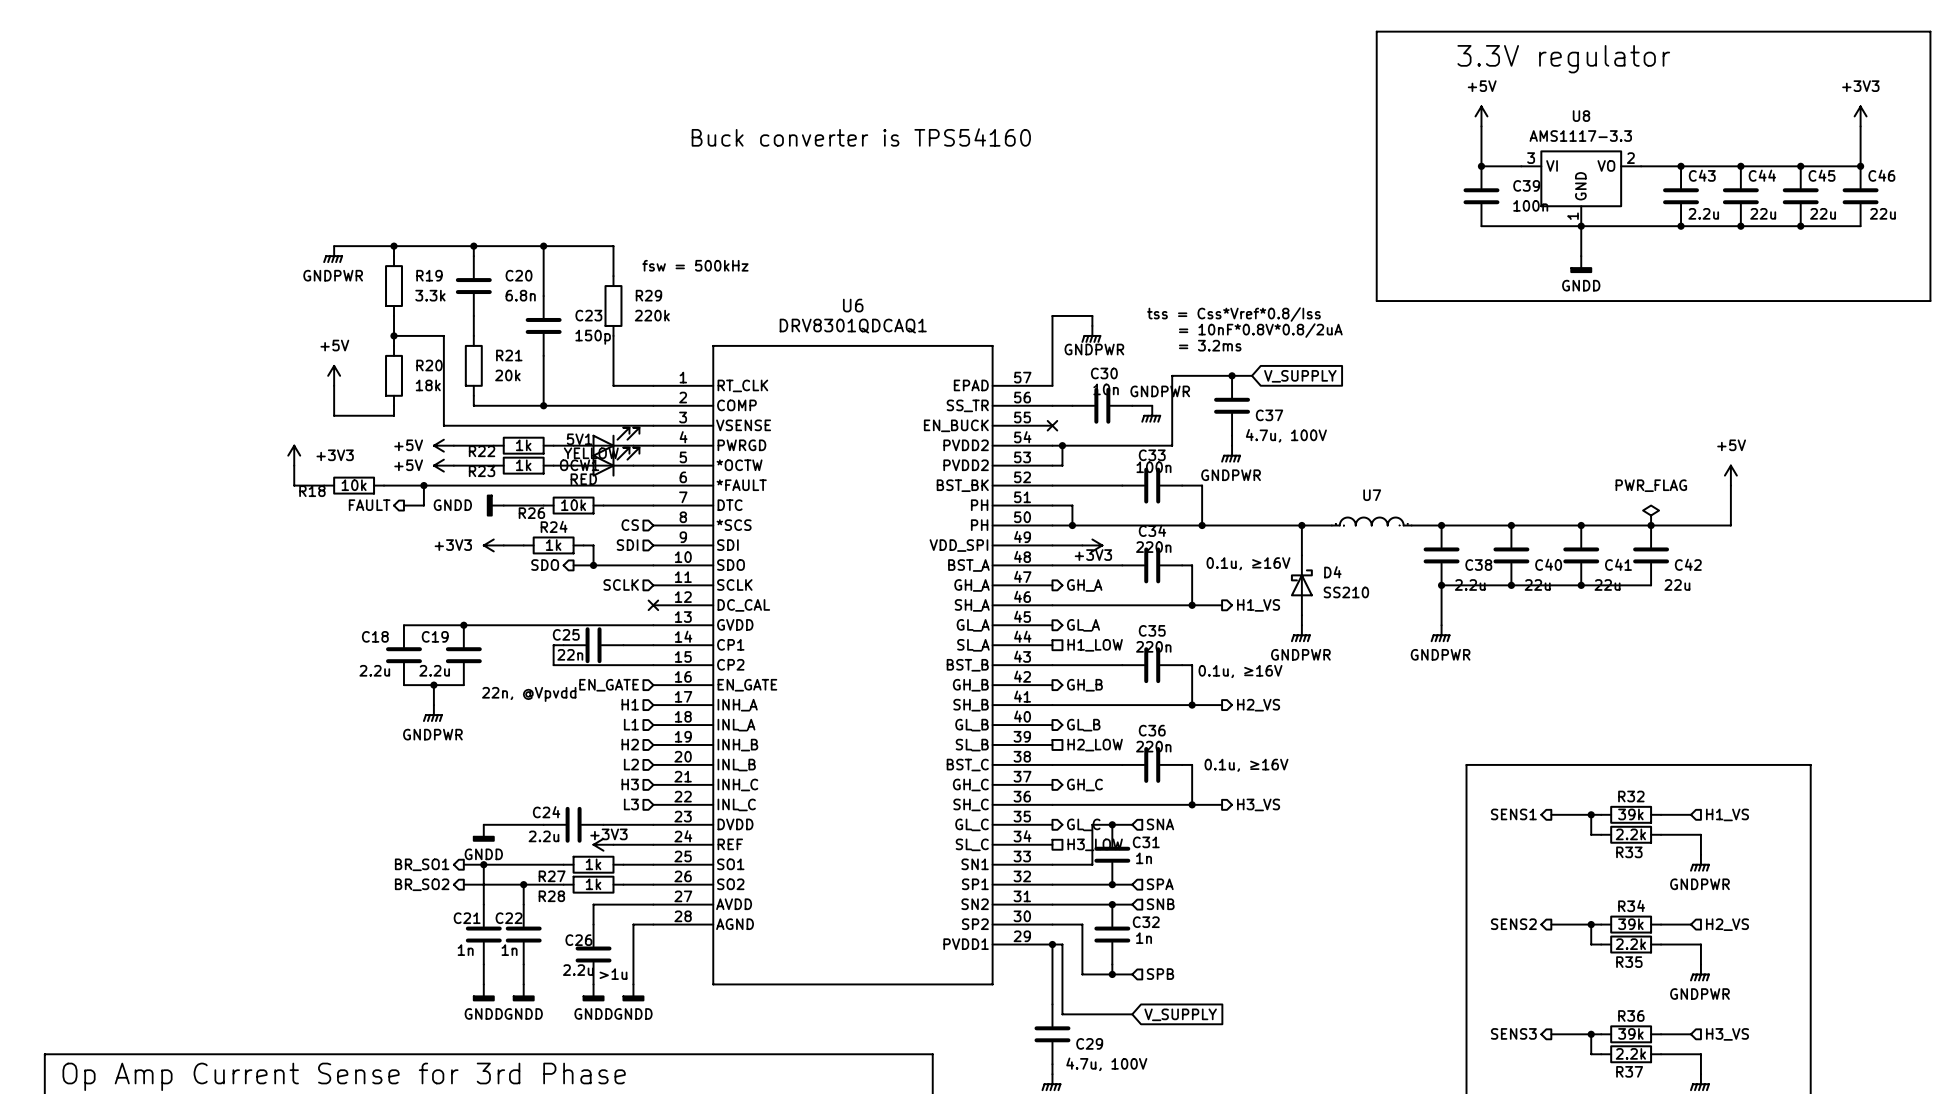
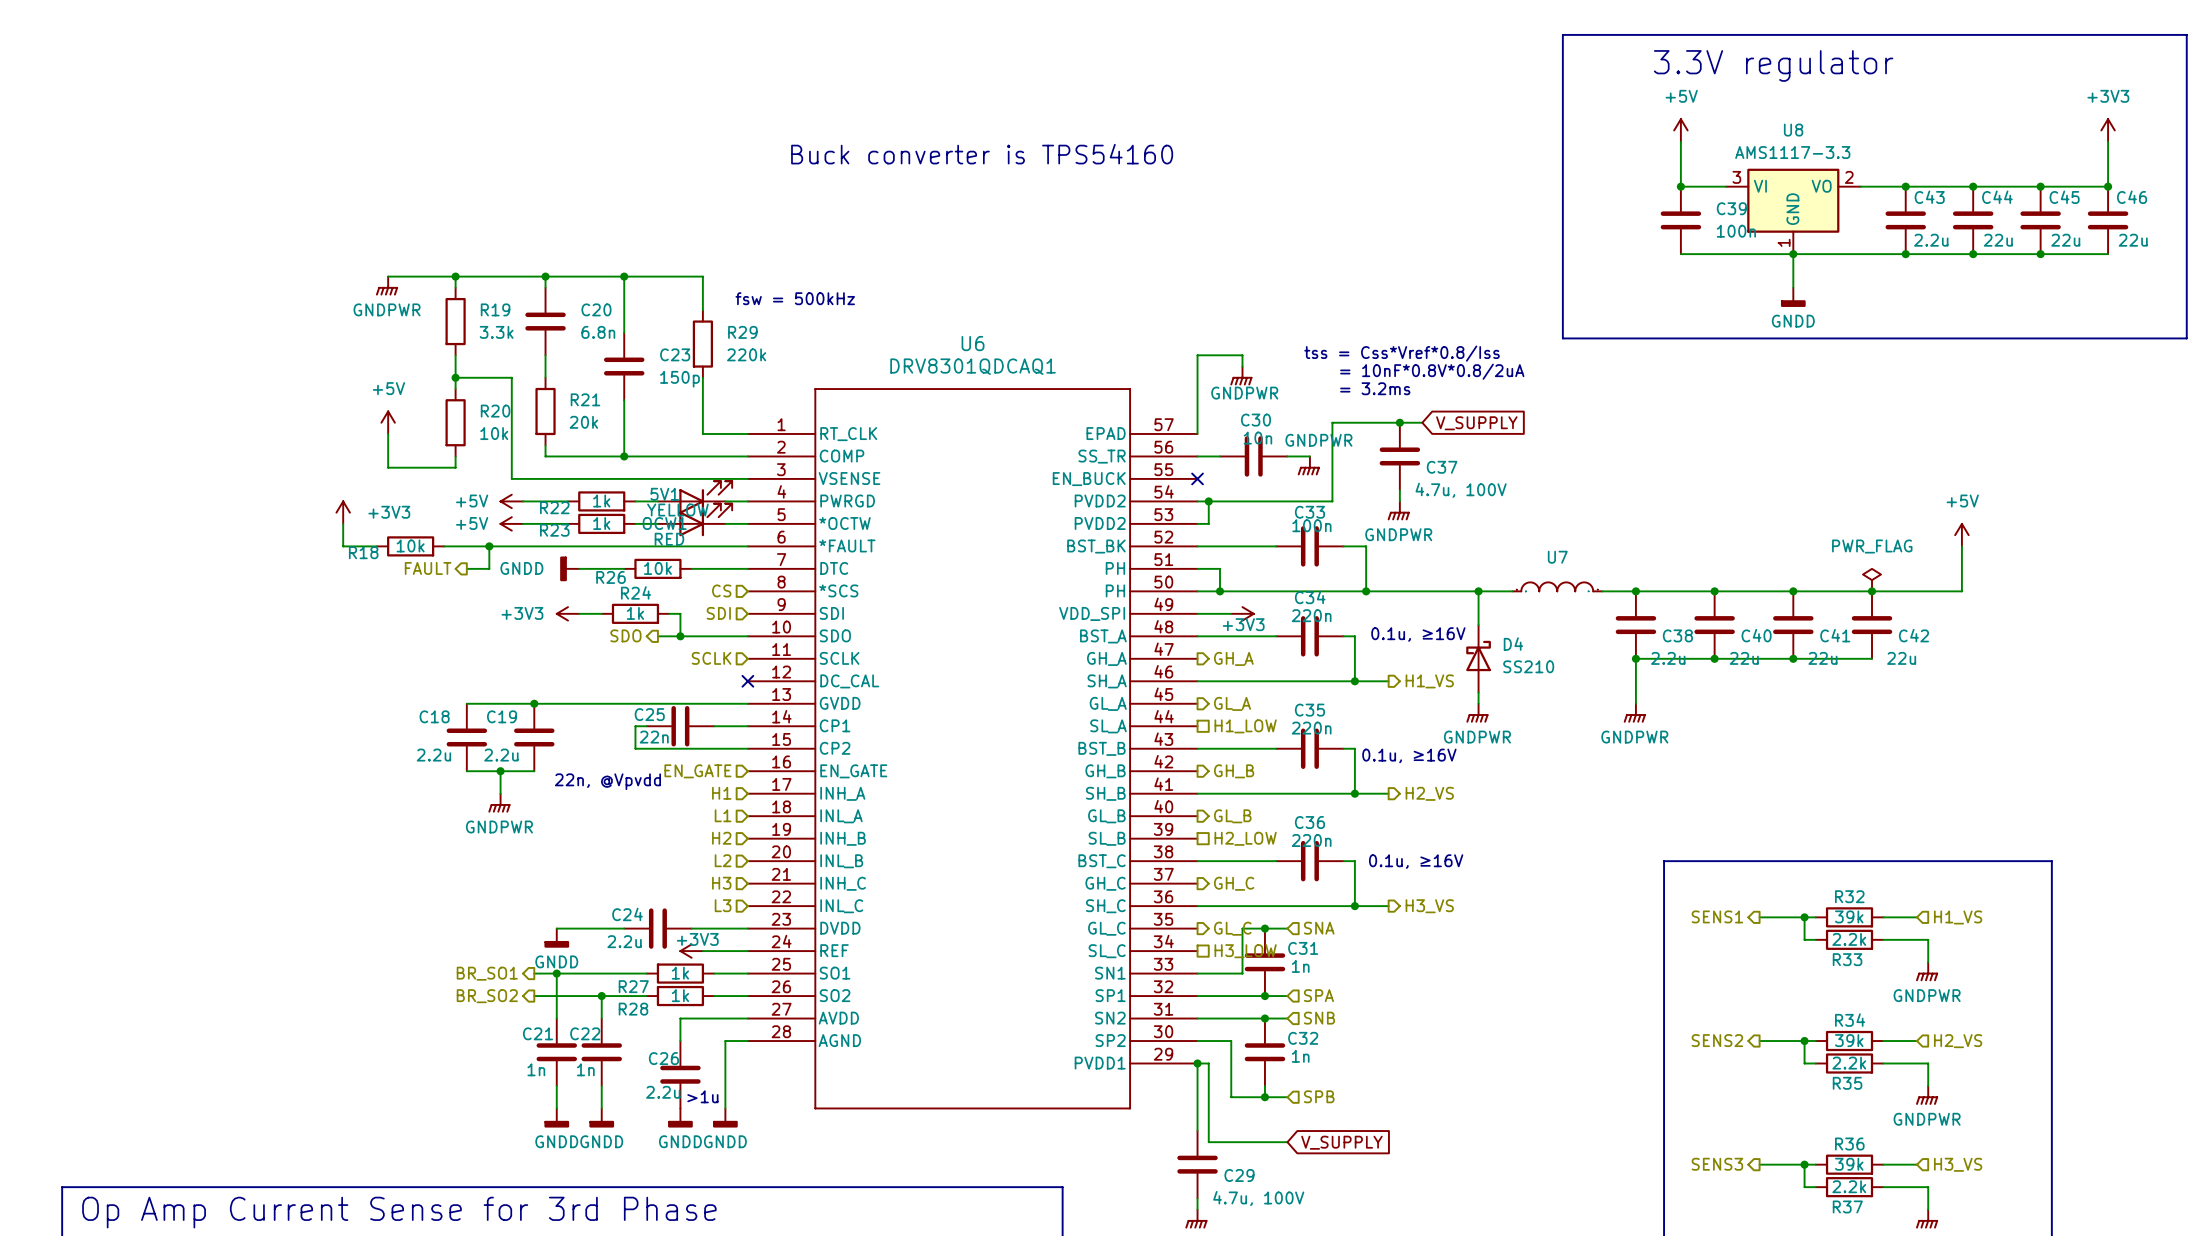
R20 value: 18k (428, 385) -> 10k (494, 433)

